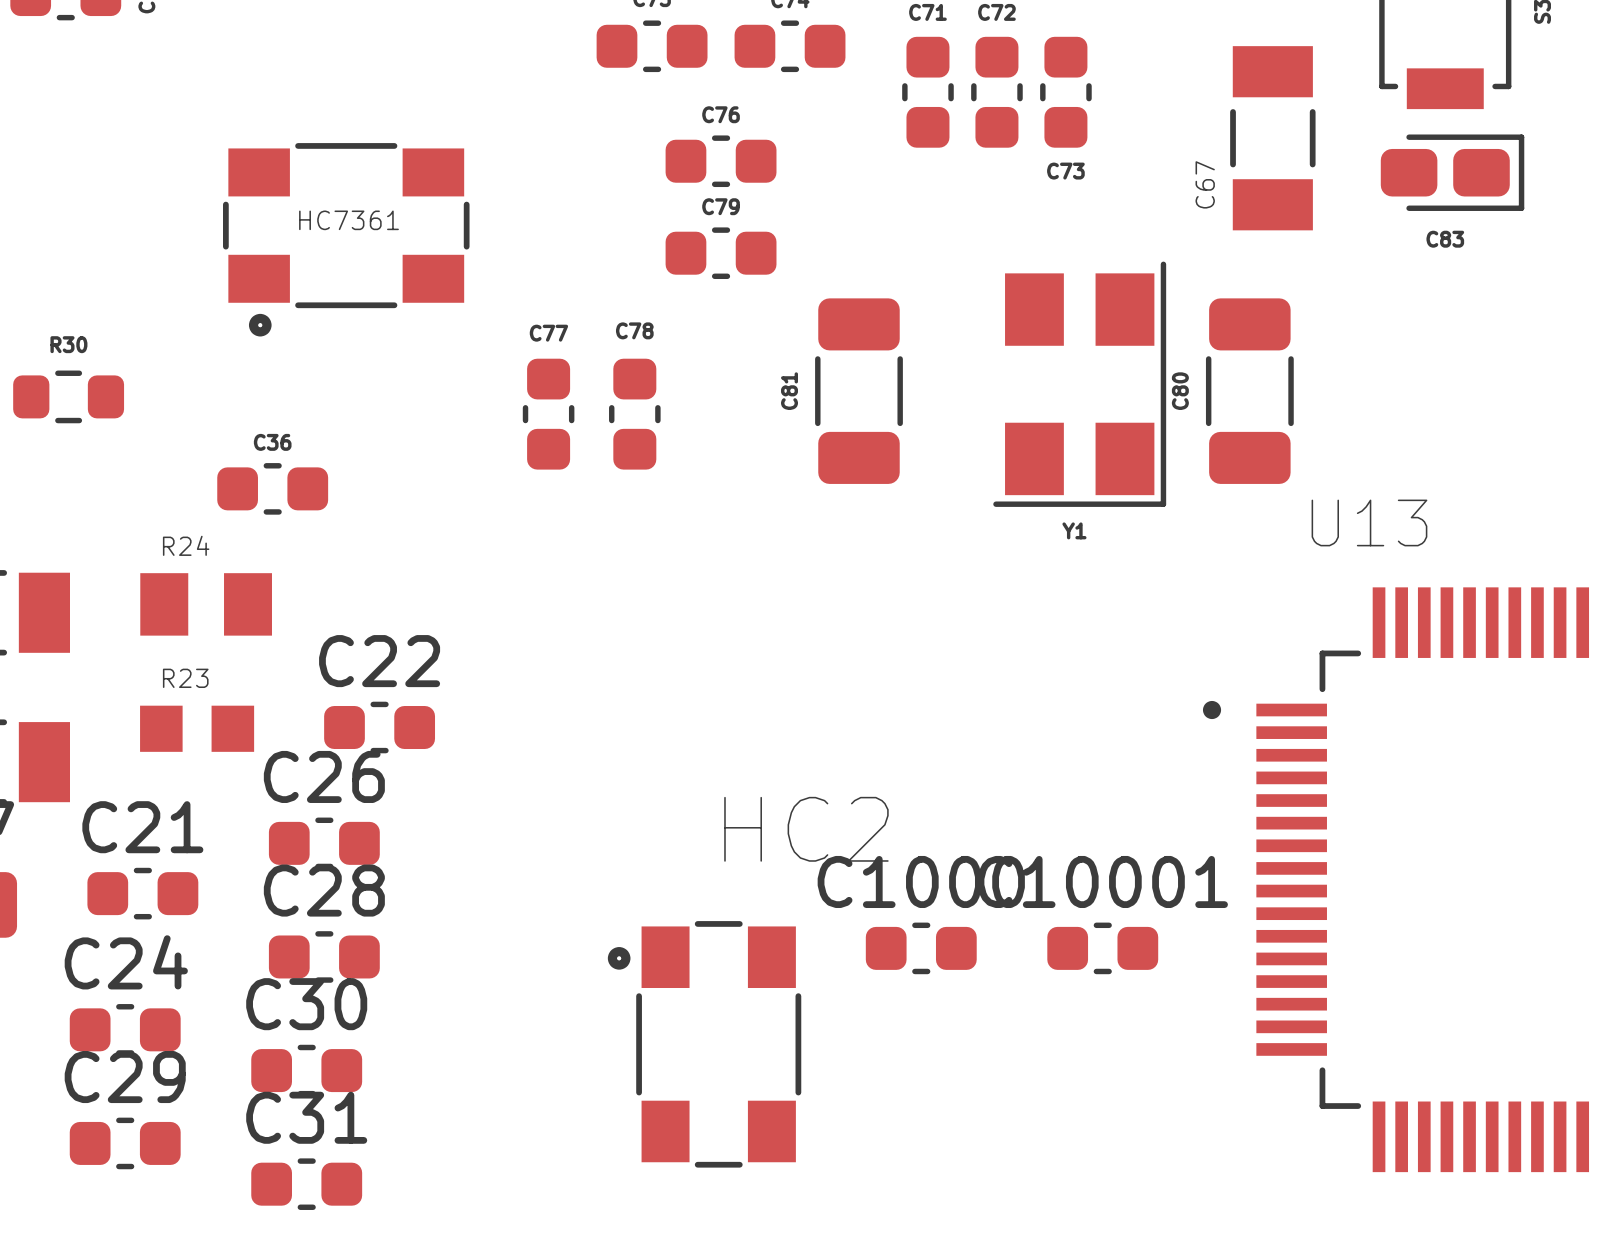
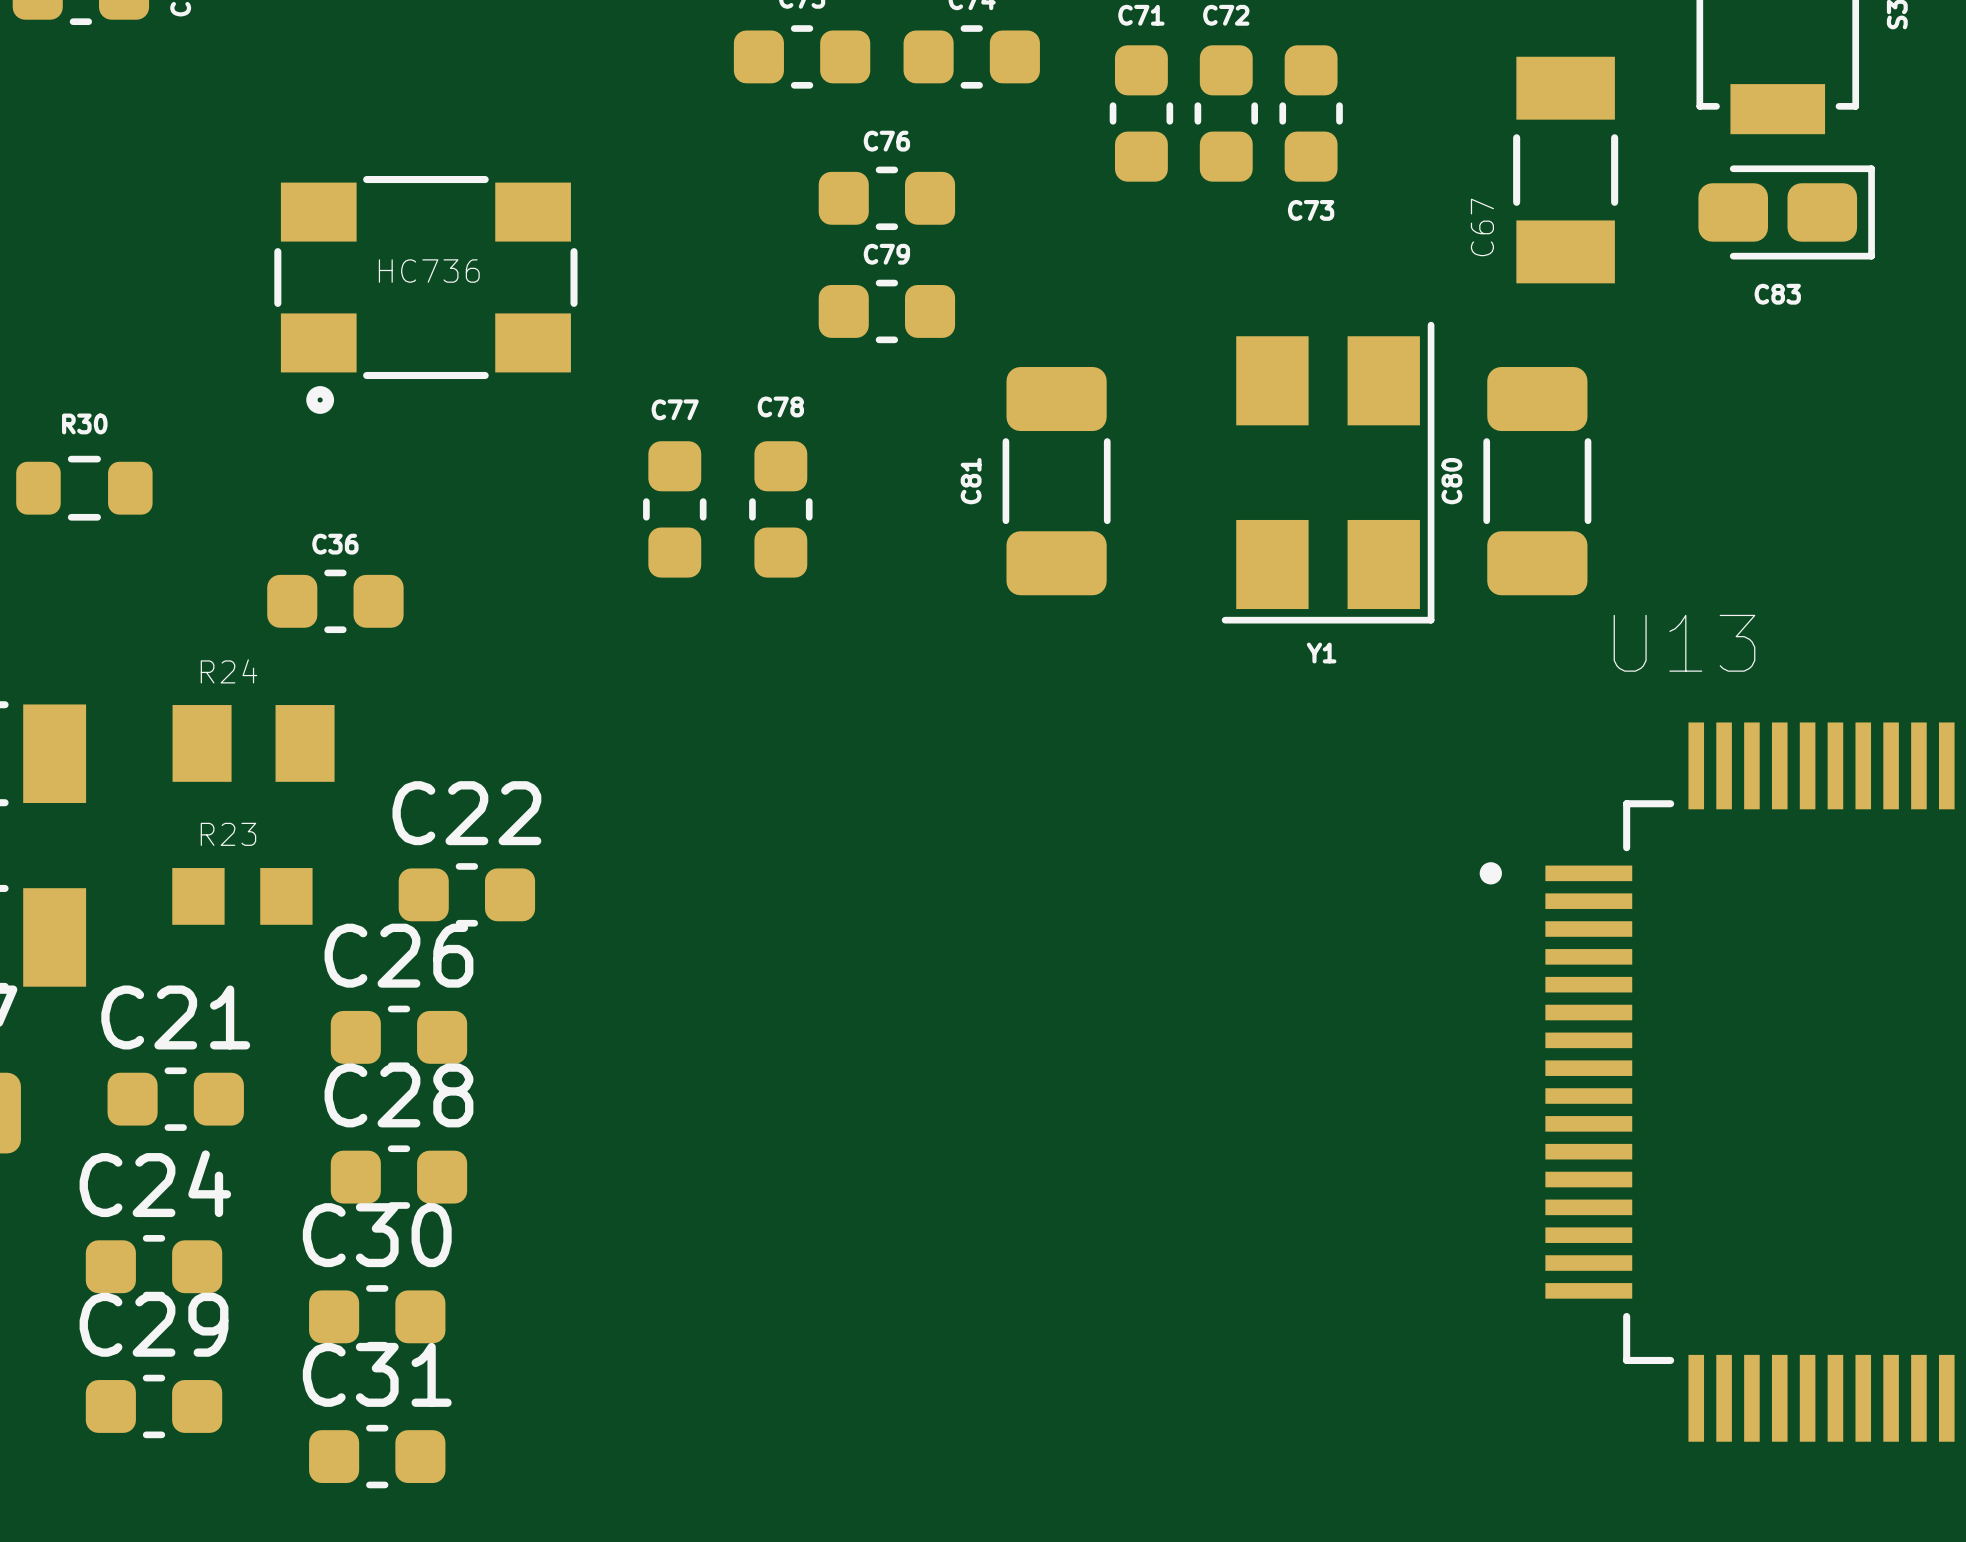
HC7361 name: HC7361 (349, 220) -> HC736 (429, 271)
C1000: (921, 948) -> none
C10001: (1102, 948) -> none
HC2: (704, 1044) -> none

